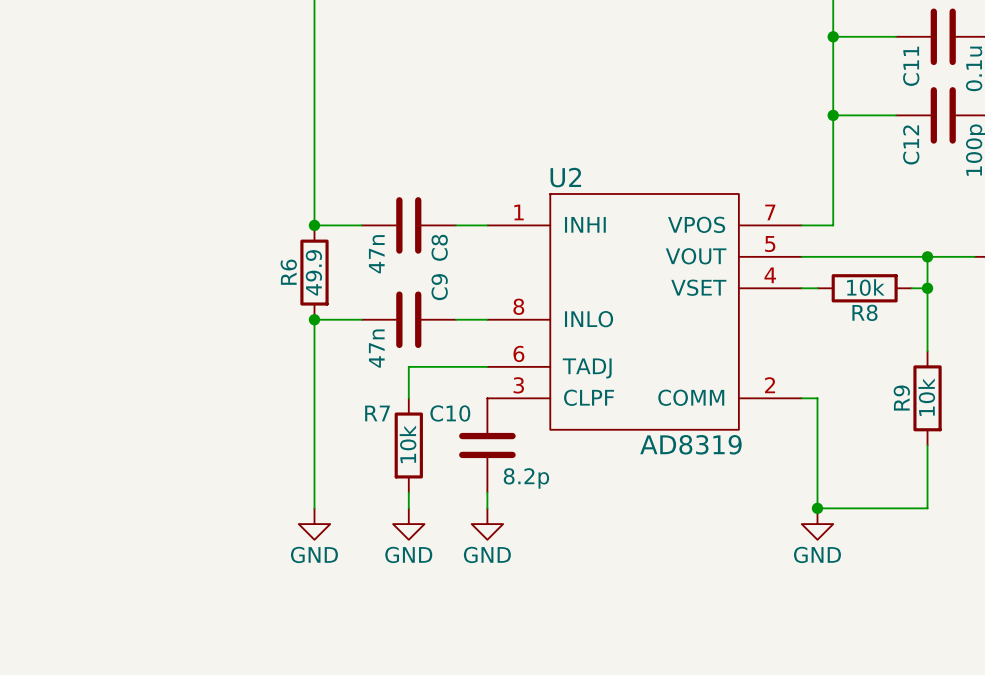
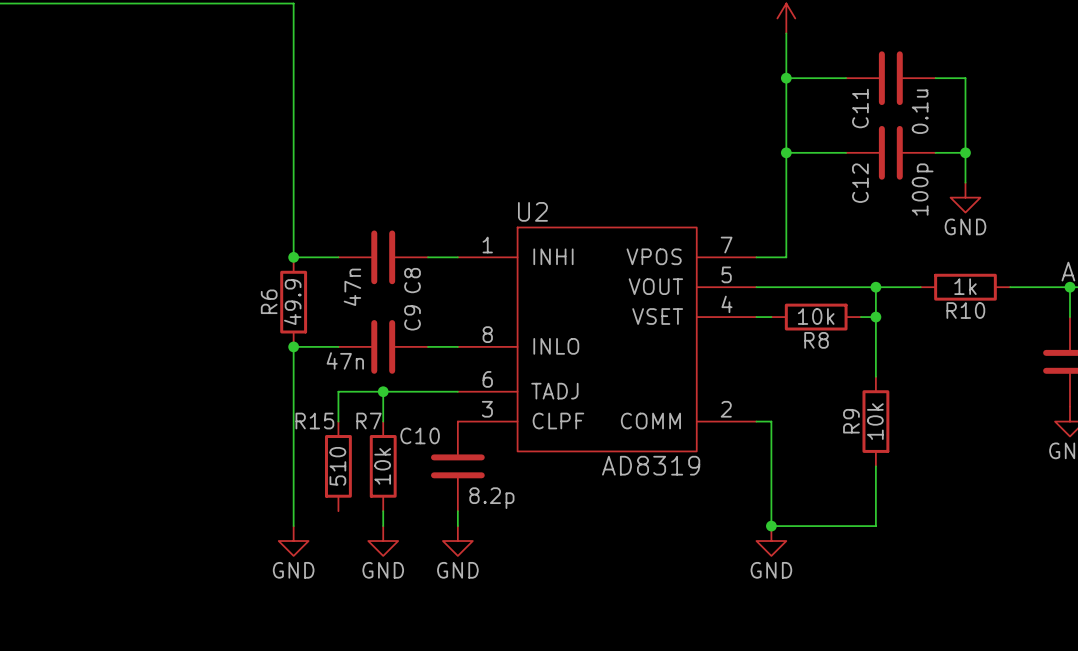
C9 value rotation: 0° (376, 348) -> 90° clockwise (345, 360)
wire: none -> (383, 391) (338, 391) (338, 421)
junction: none -> (383, 391)
R7 name position: R7 (377, 413) -> R7 (369, 421)
R15: none -> 510 (338, 466)

